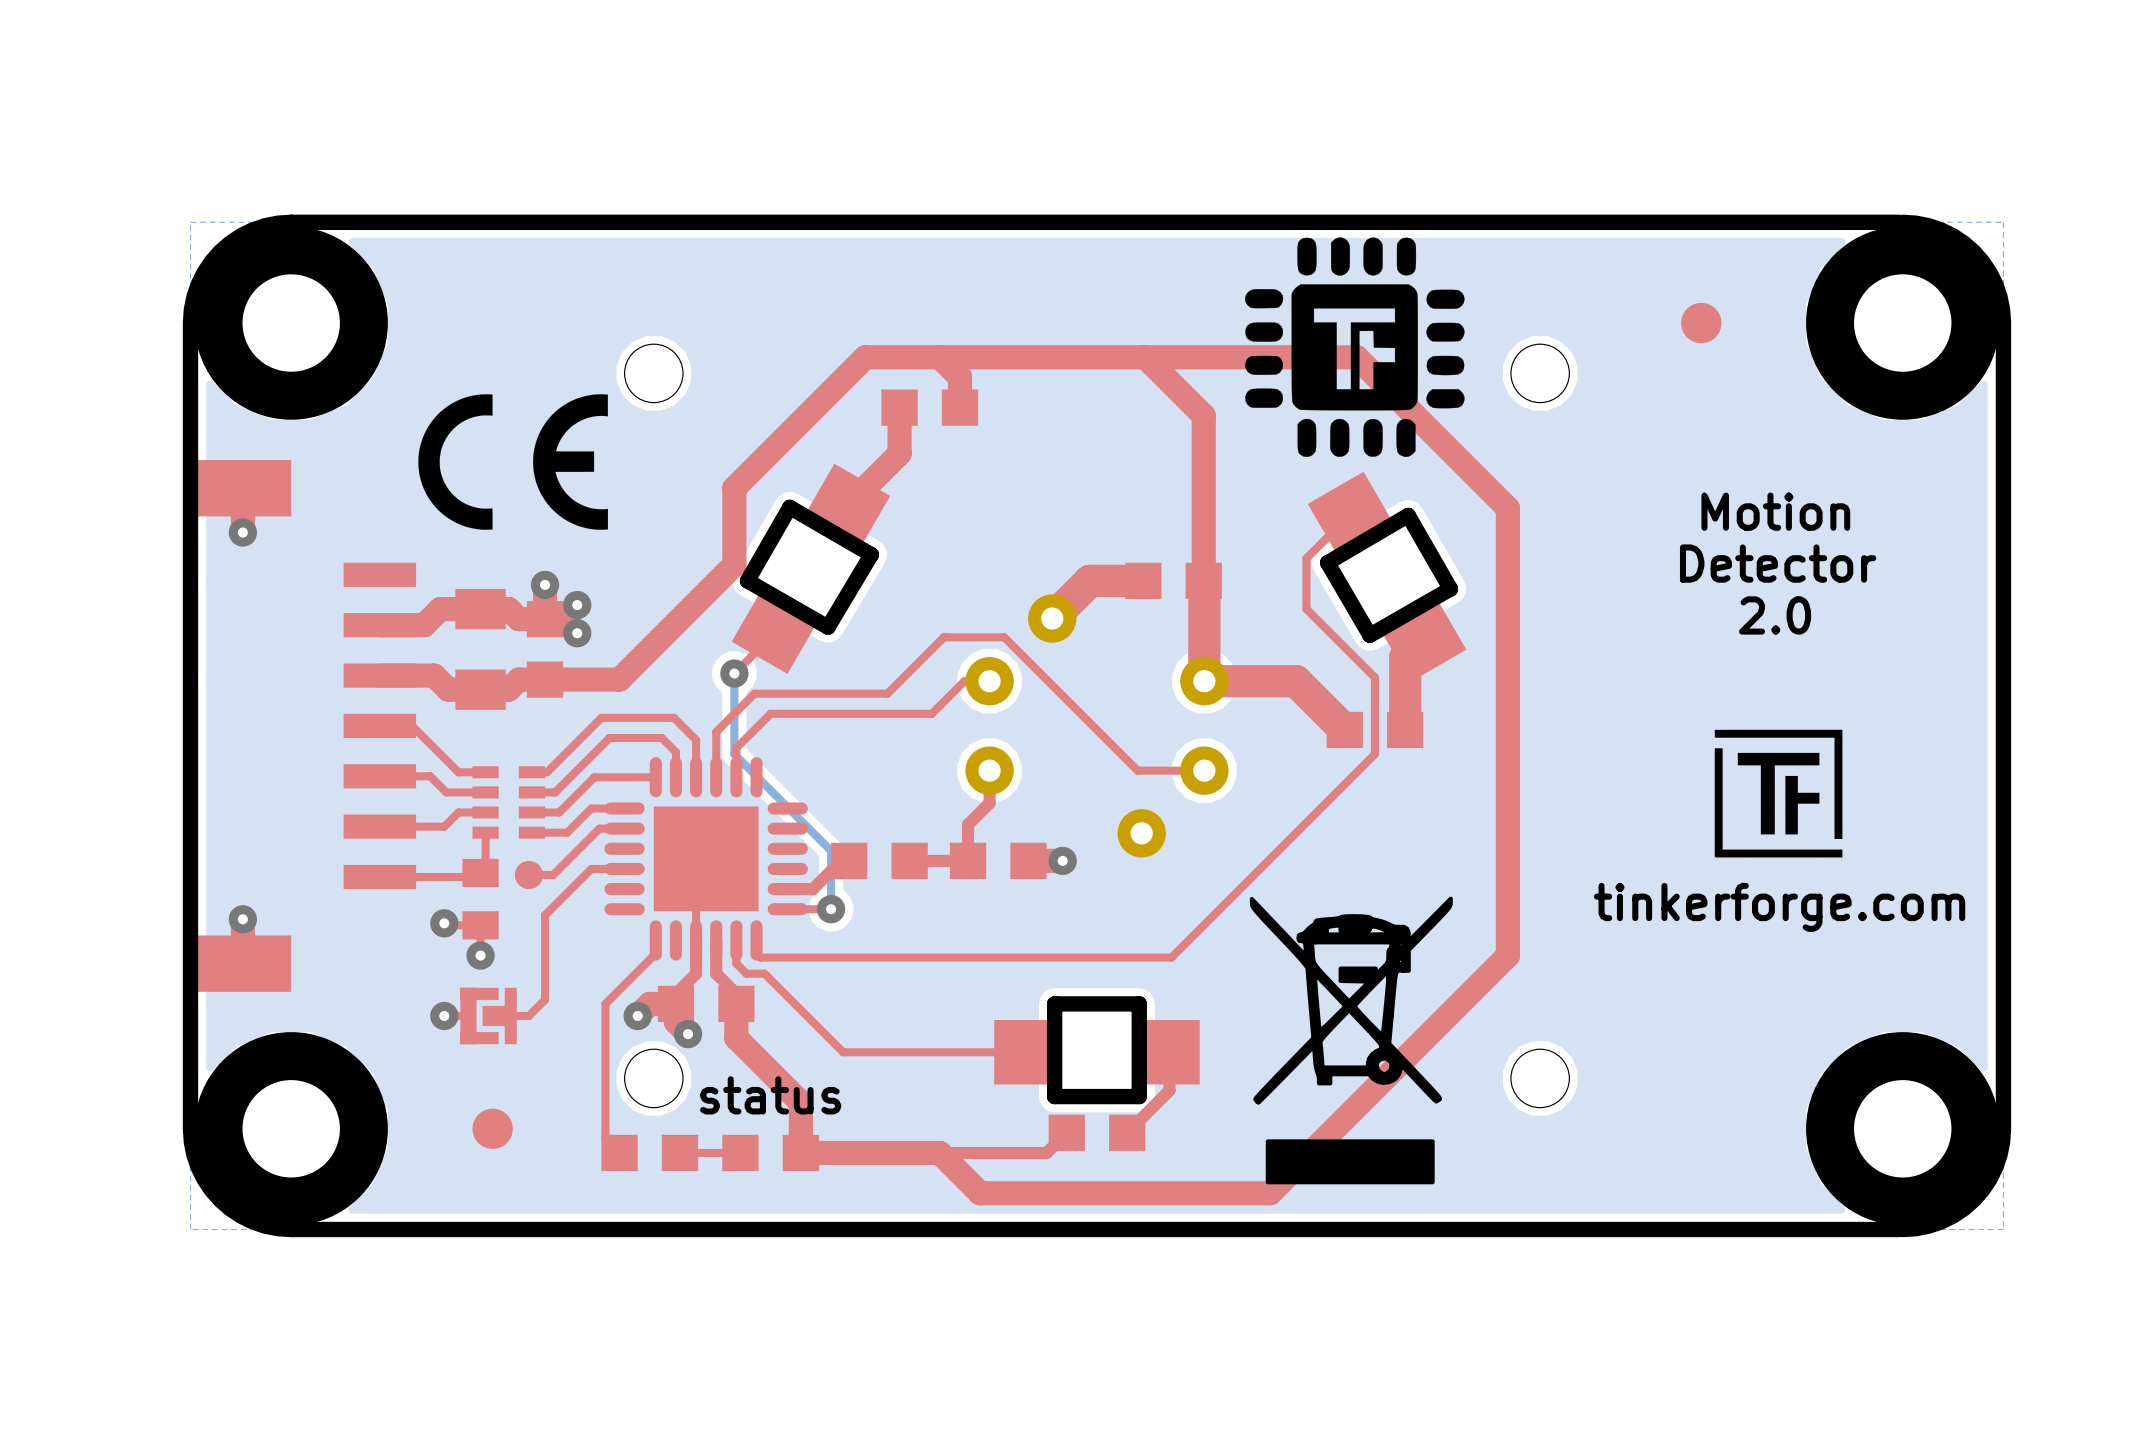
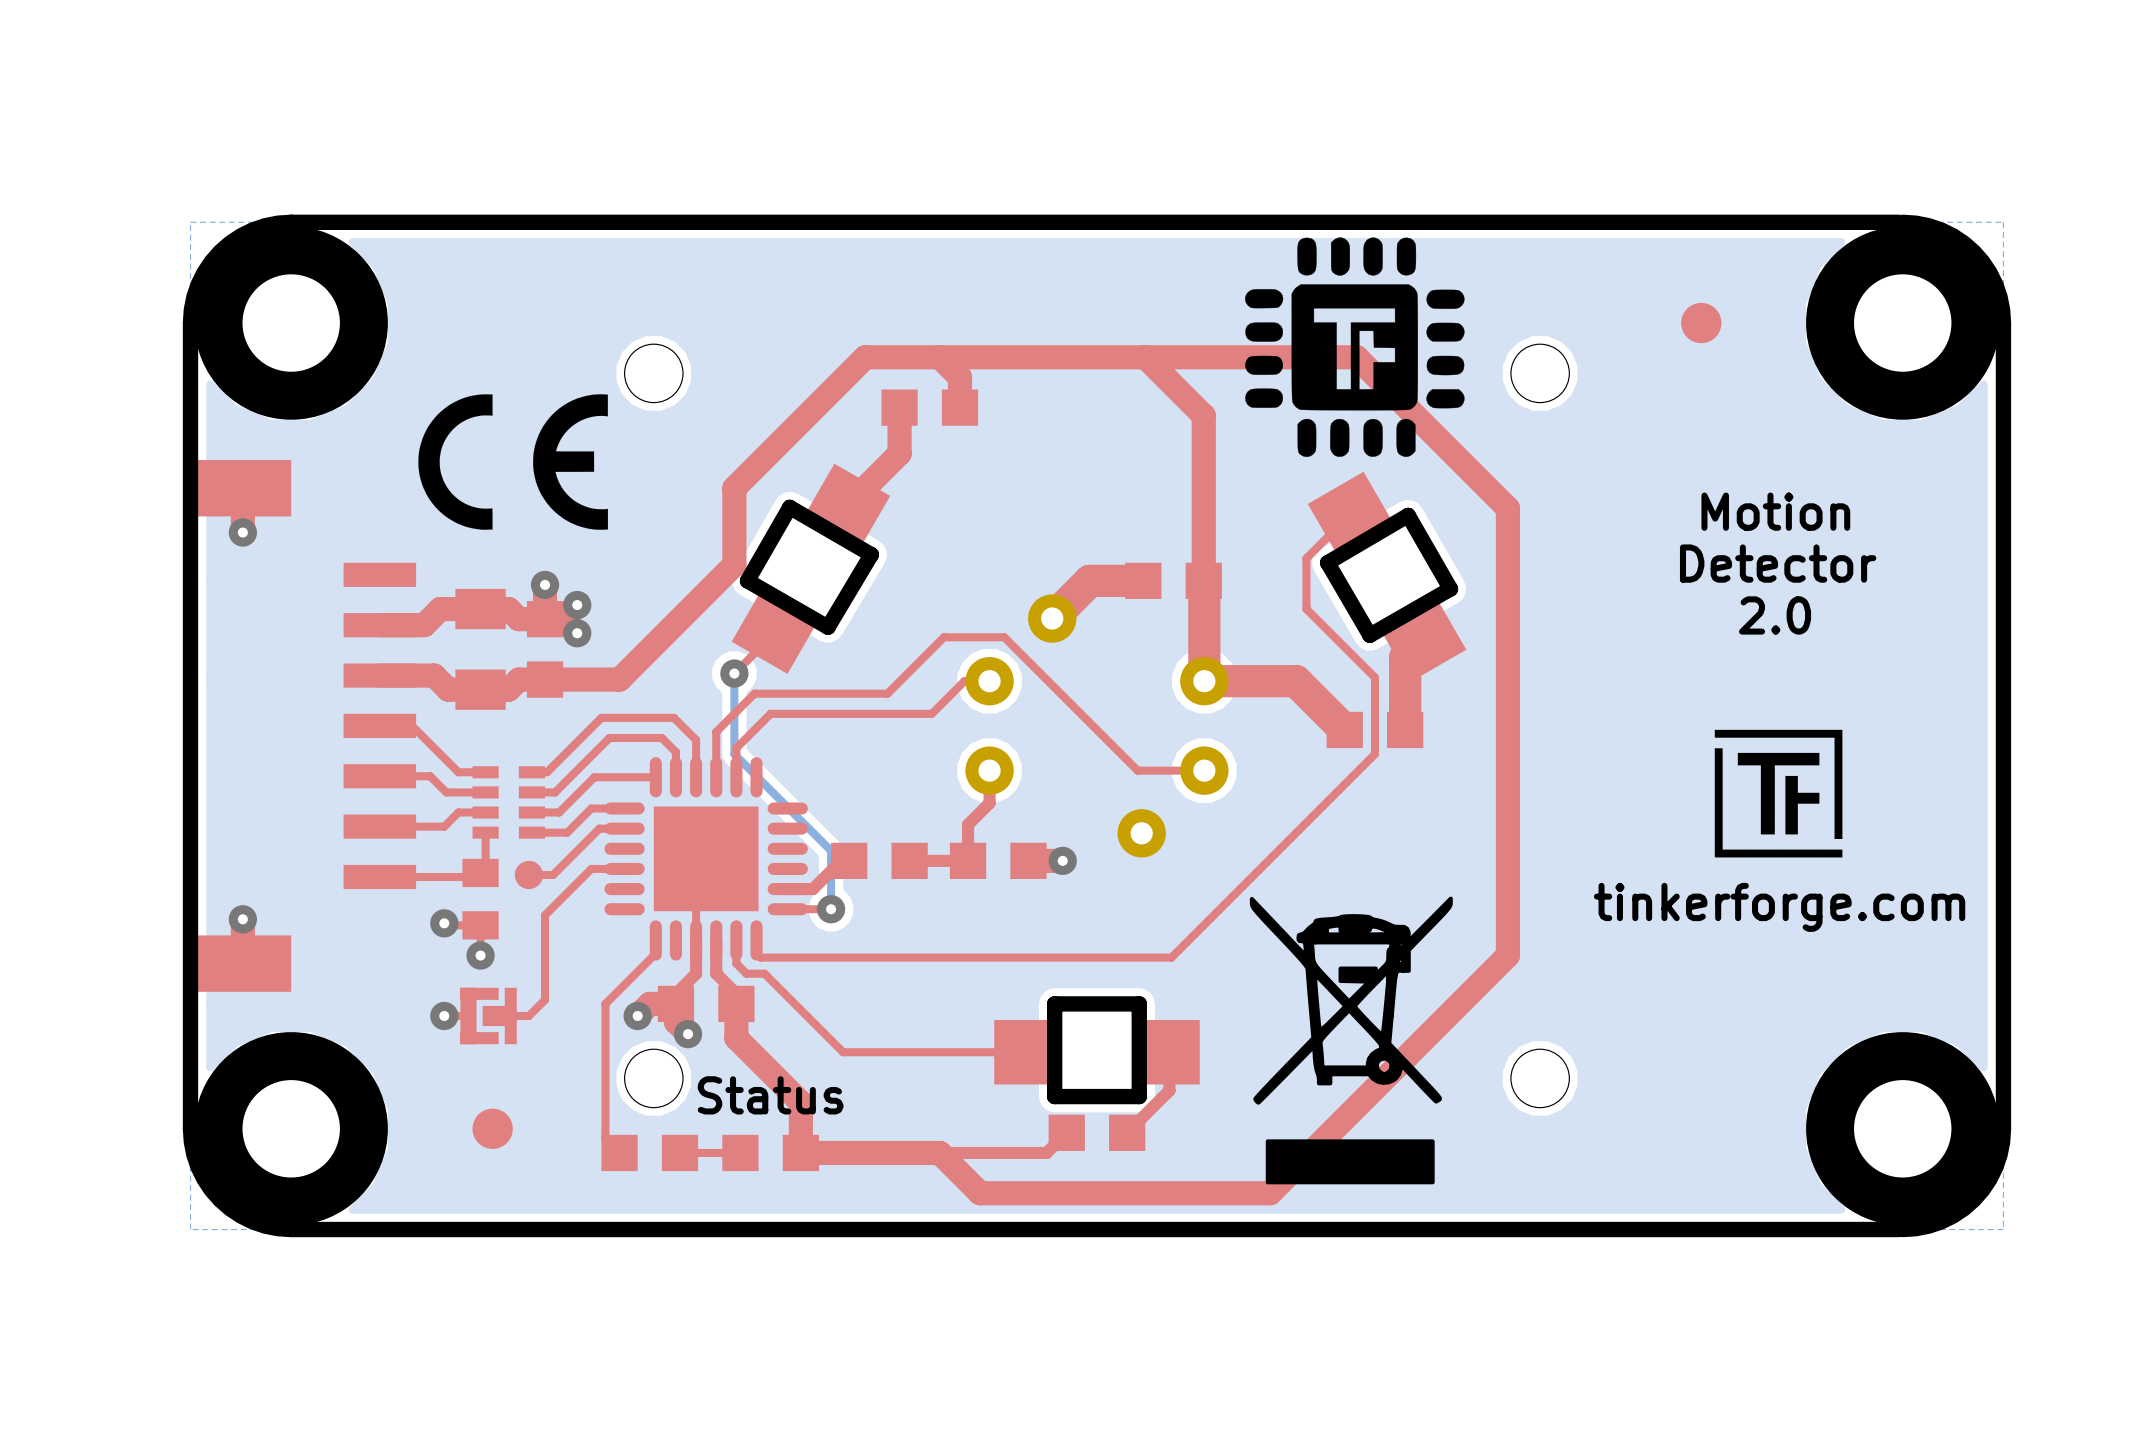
text: status (770, 1095) -> Status (770, 1095)

